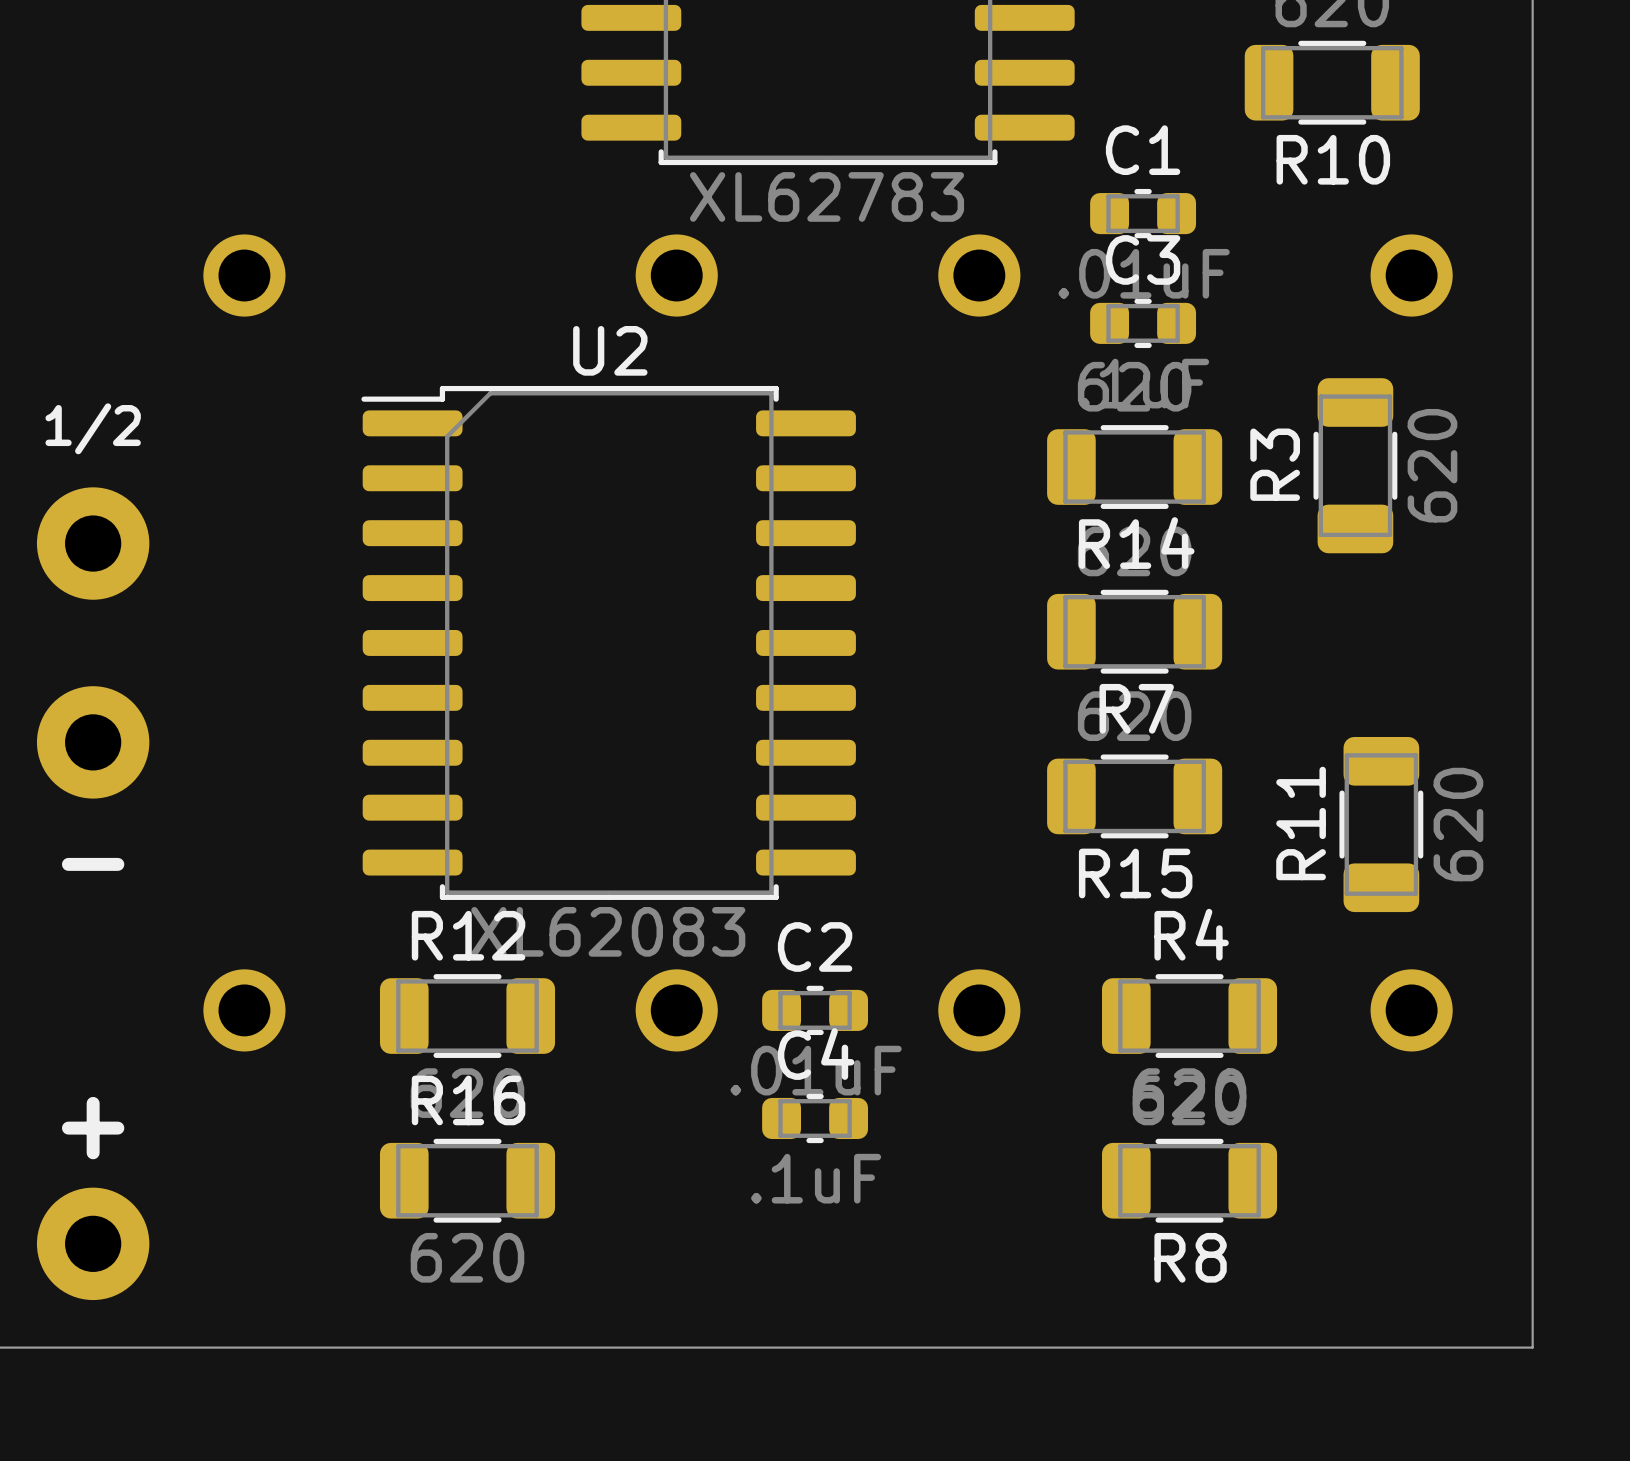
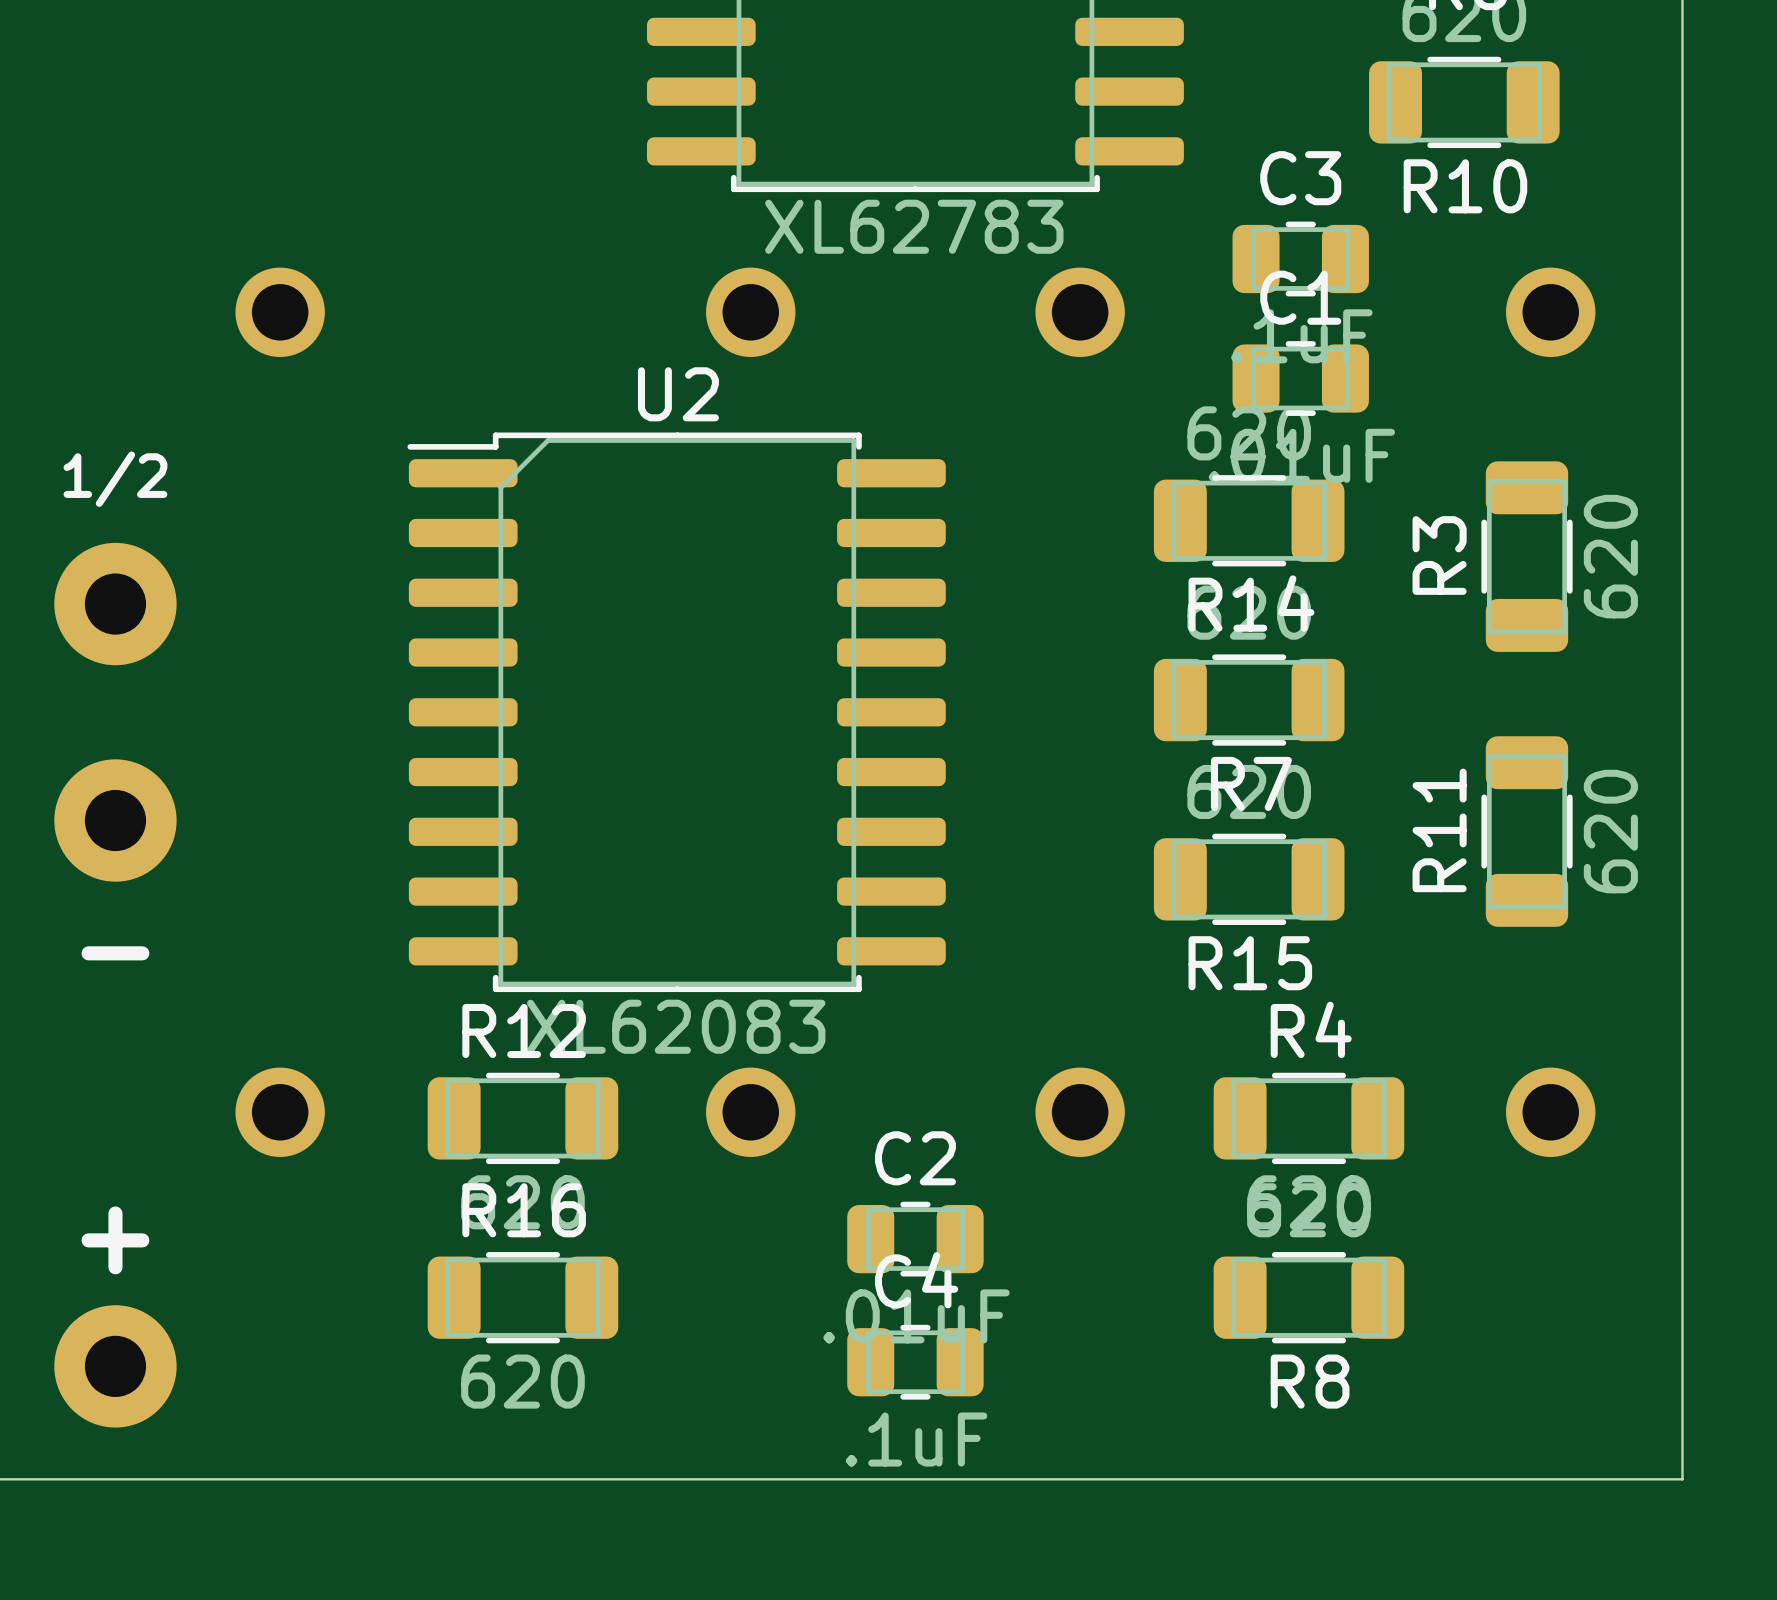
C1 footprint: [1090, 188, 1197, 239] -> [1232, 341, 1369, 416]
C3 footprint: [1090, 298, 1197, 349] -> [1232, 221, 1369, 297]
R3 position: (1355, 465) -> (1527, 556)
R11 position: (1381, 824) -> (1527, 831)
C2 footprint: [762, 985, 869, 1036] -> [847, 1201, 984, 1277]
C4 footprint: [762, 1093, 869, 1144] -> [847, 1324, 984, 1400]

